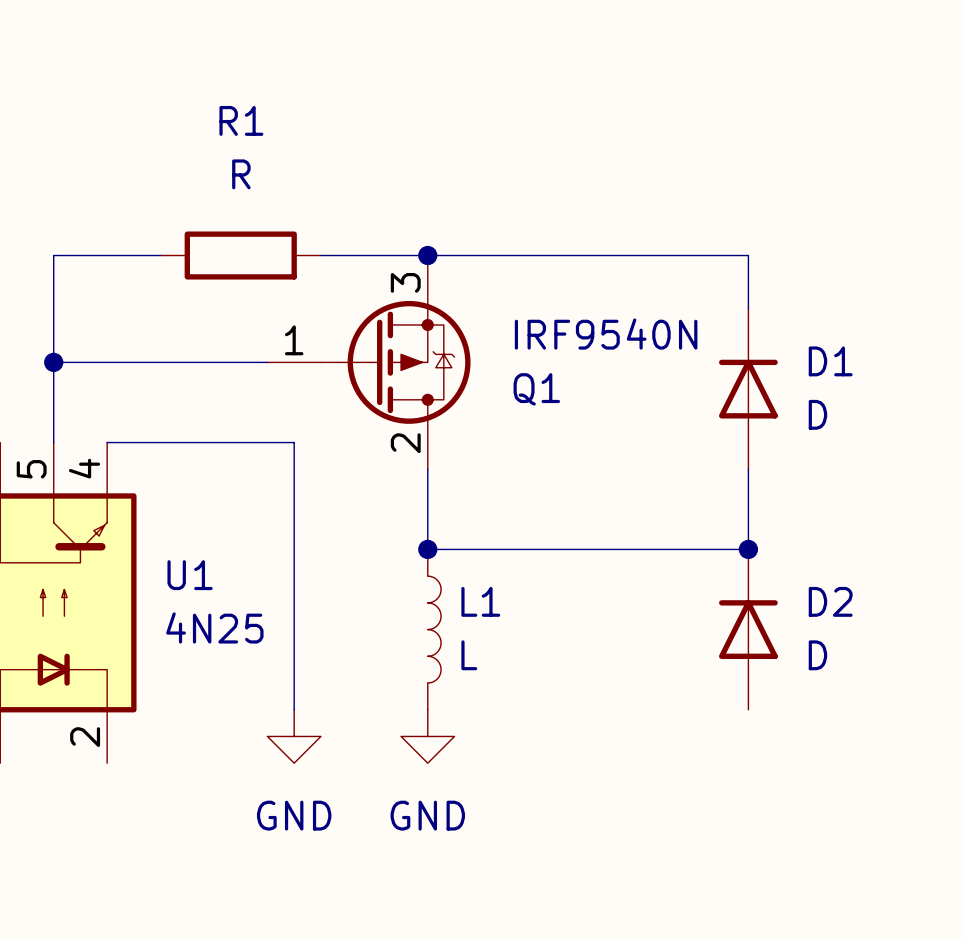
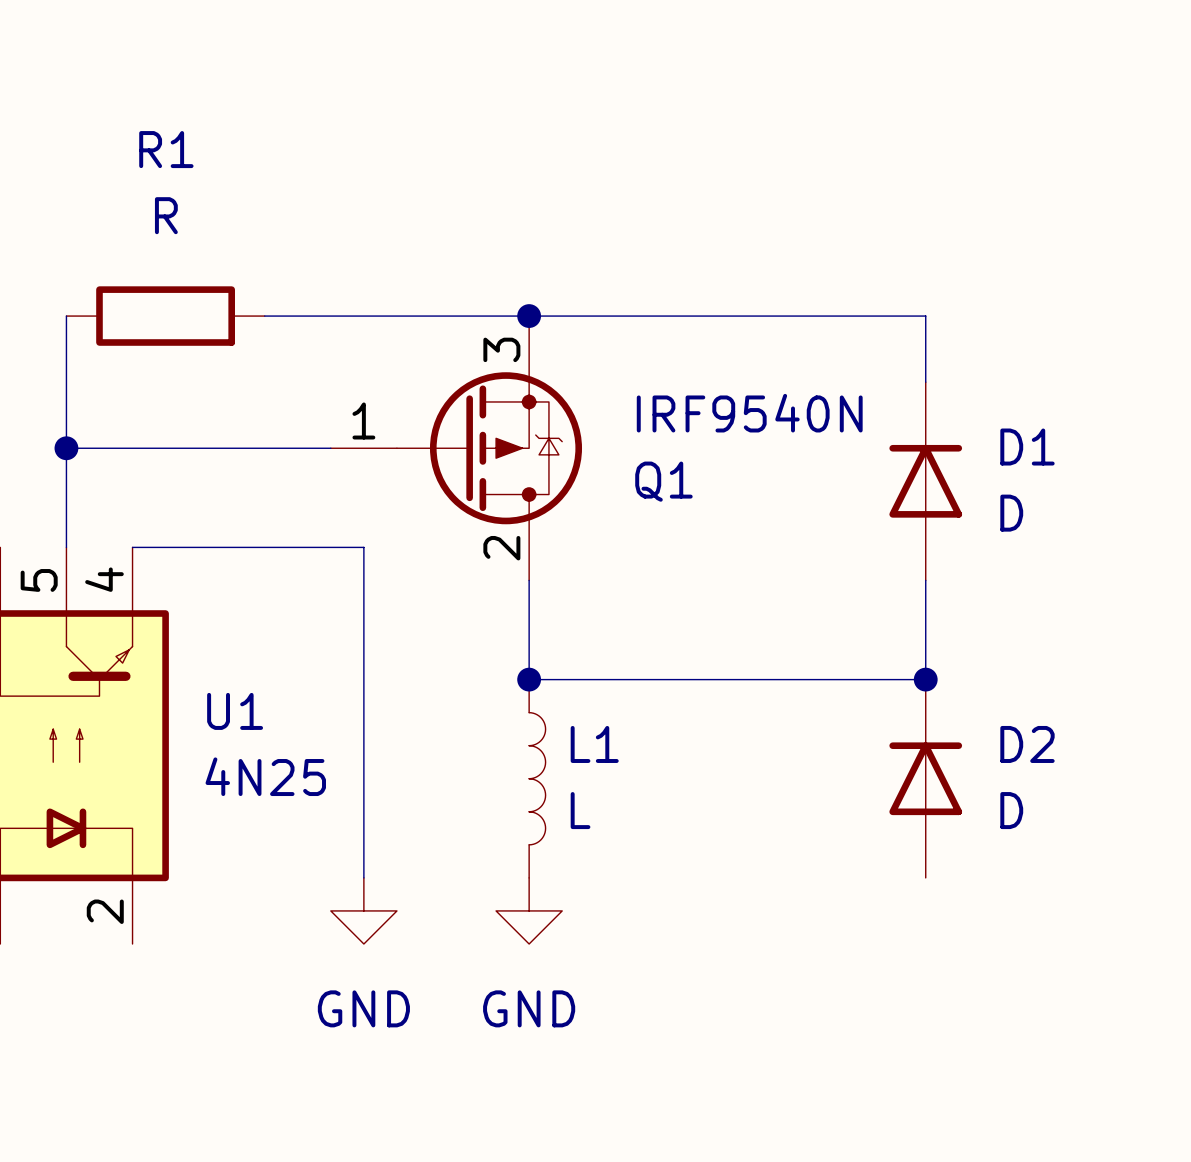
wire: (53, 255) (160, 255) -> (264, 316) (396, 316)
R1 position: (240, 255) -> (165, 316)

